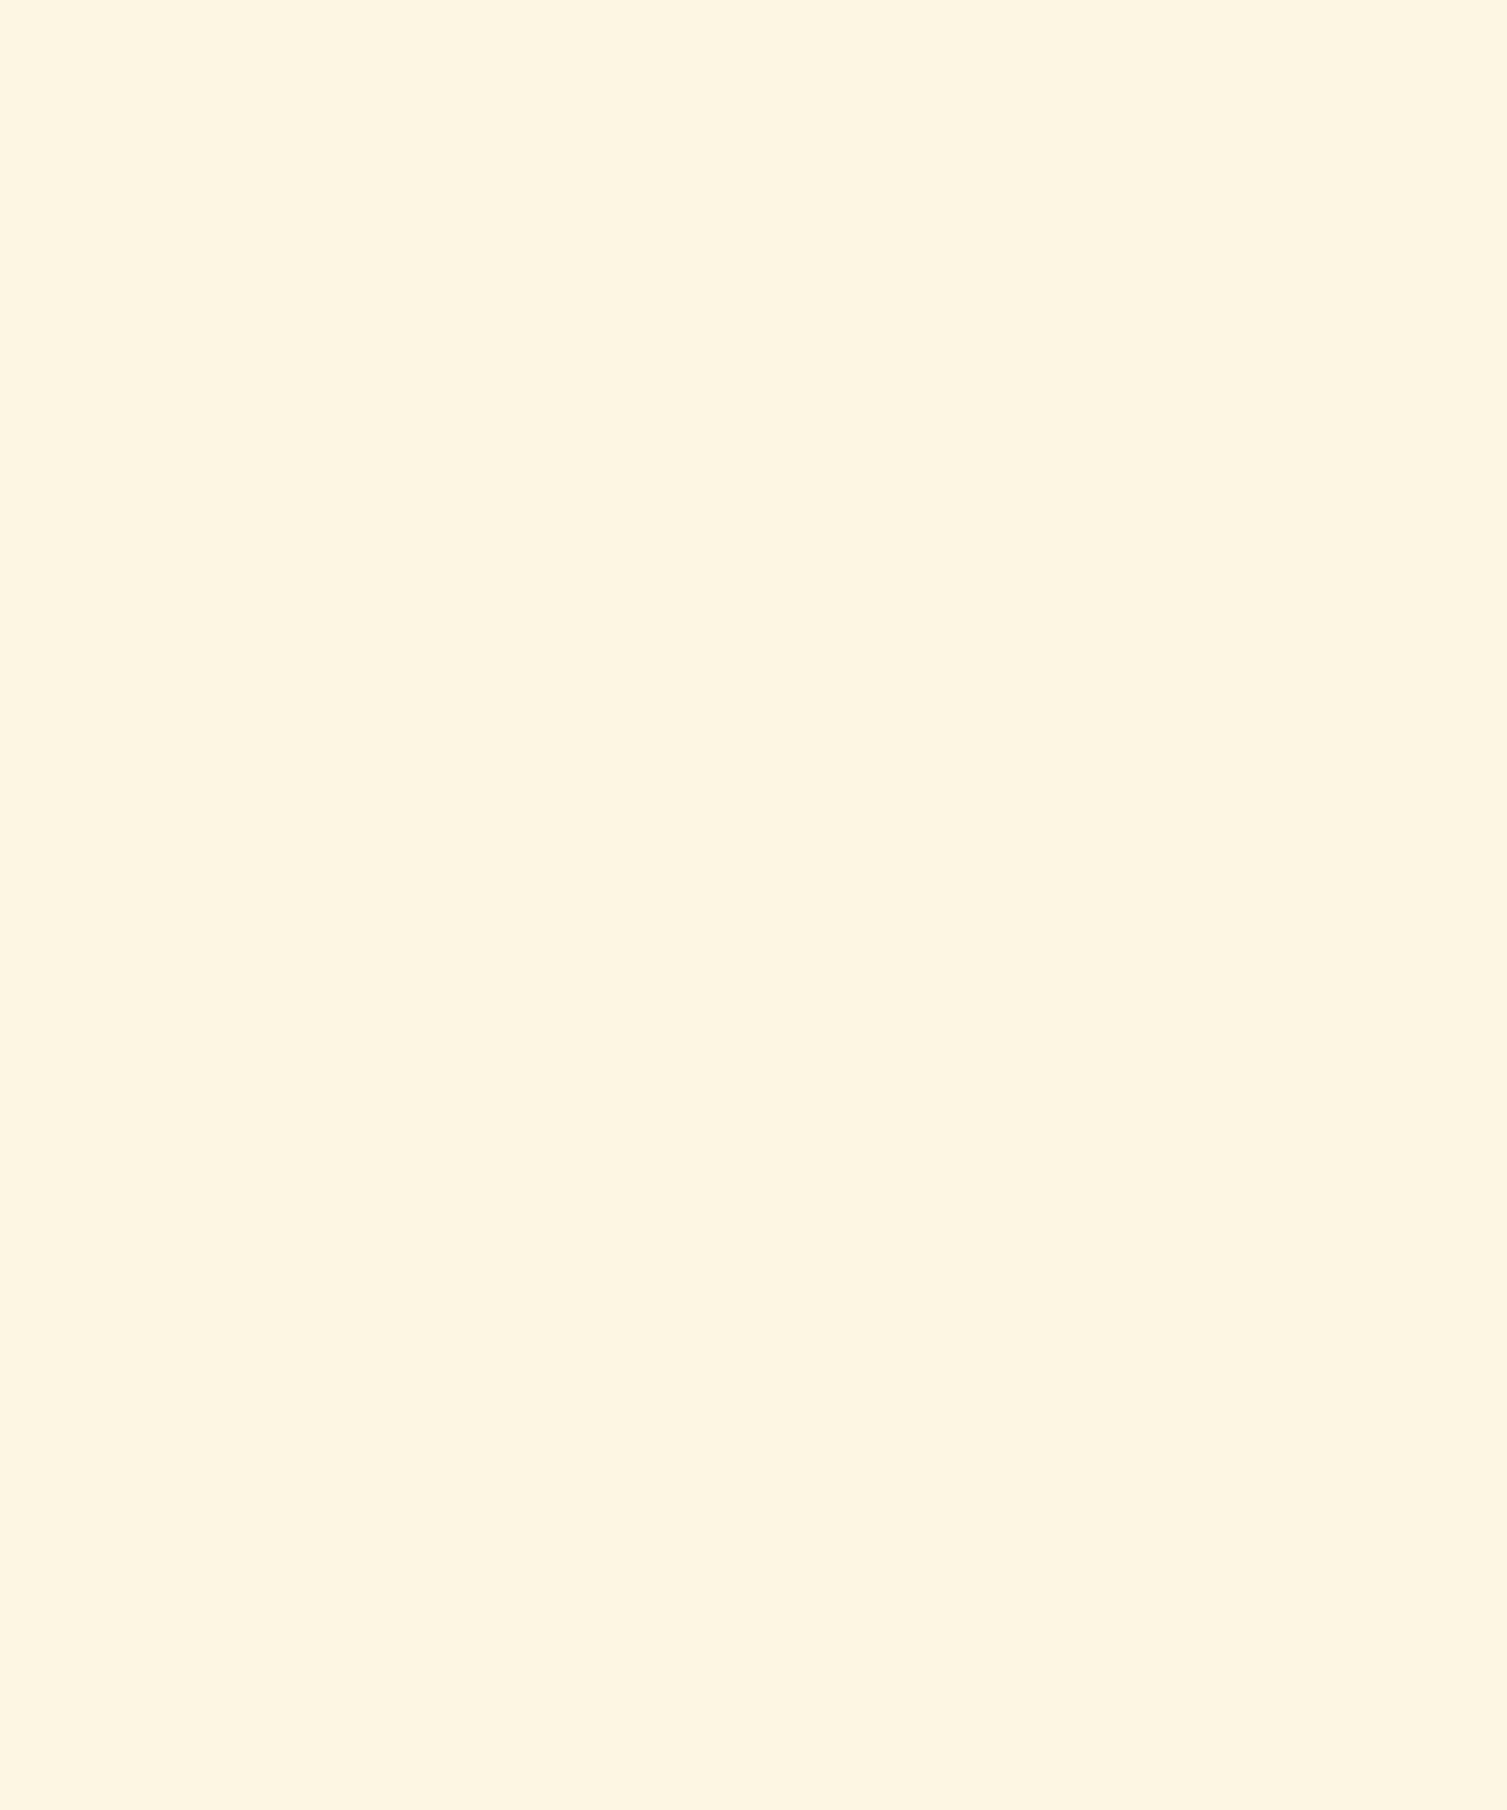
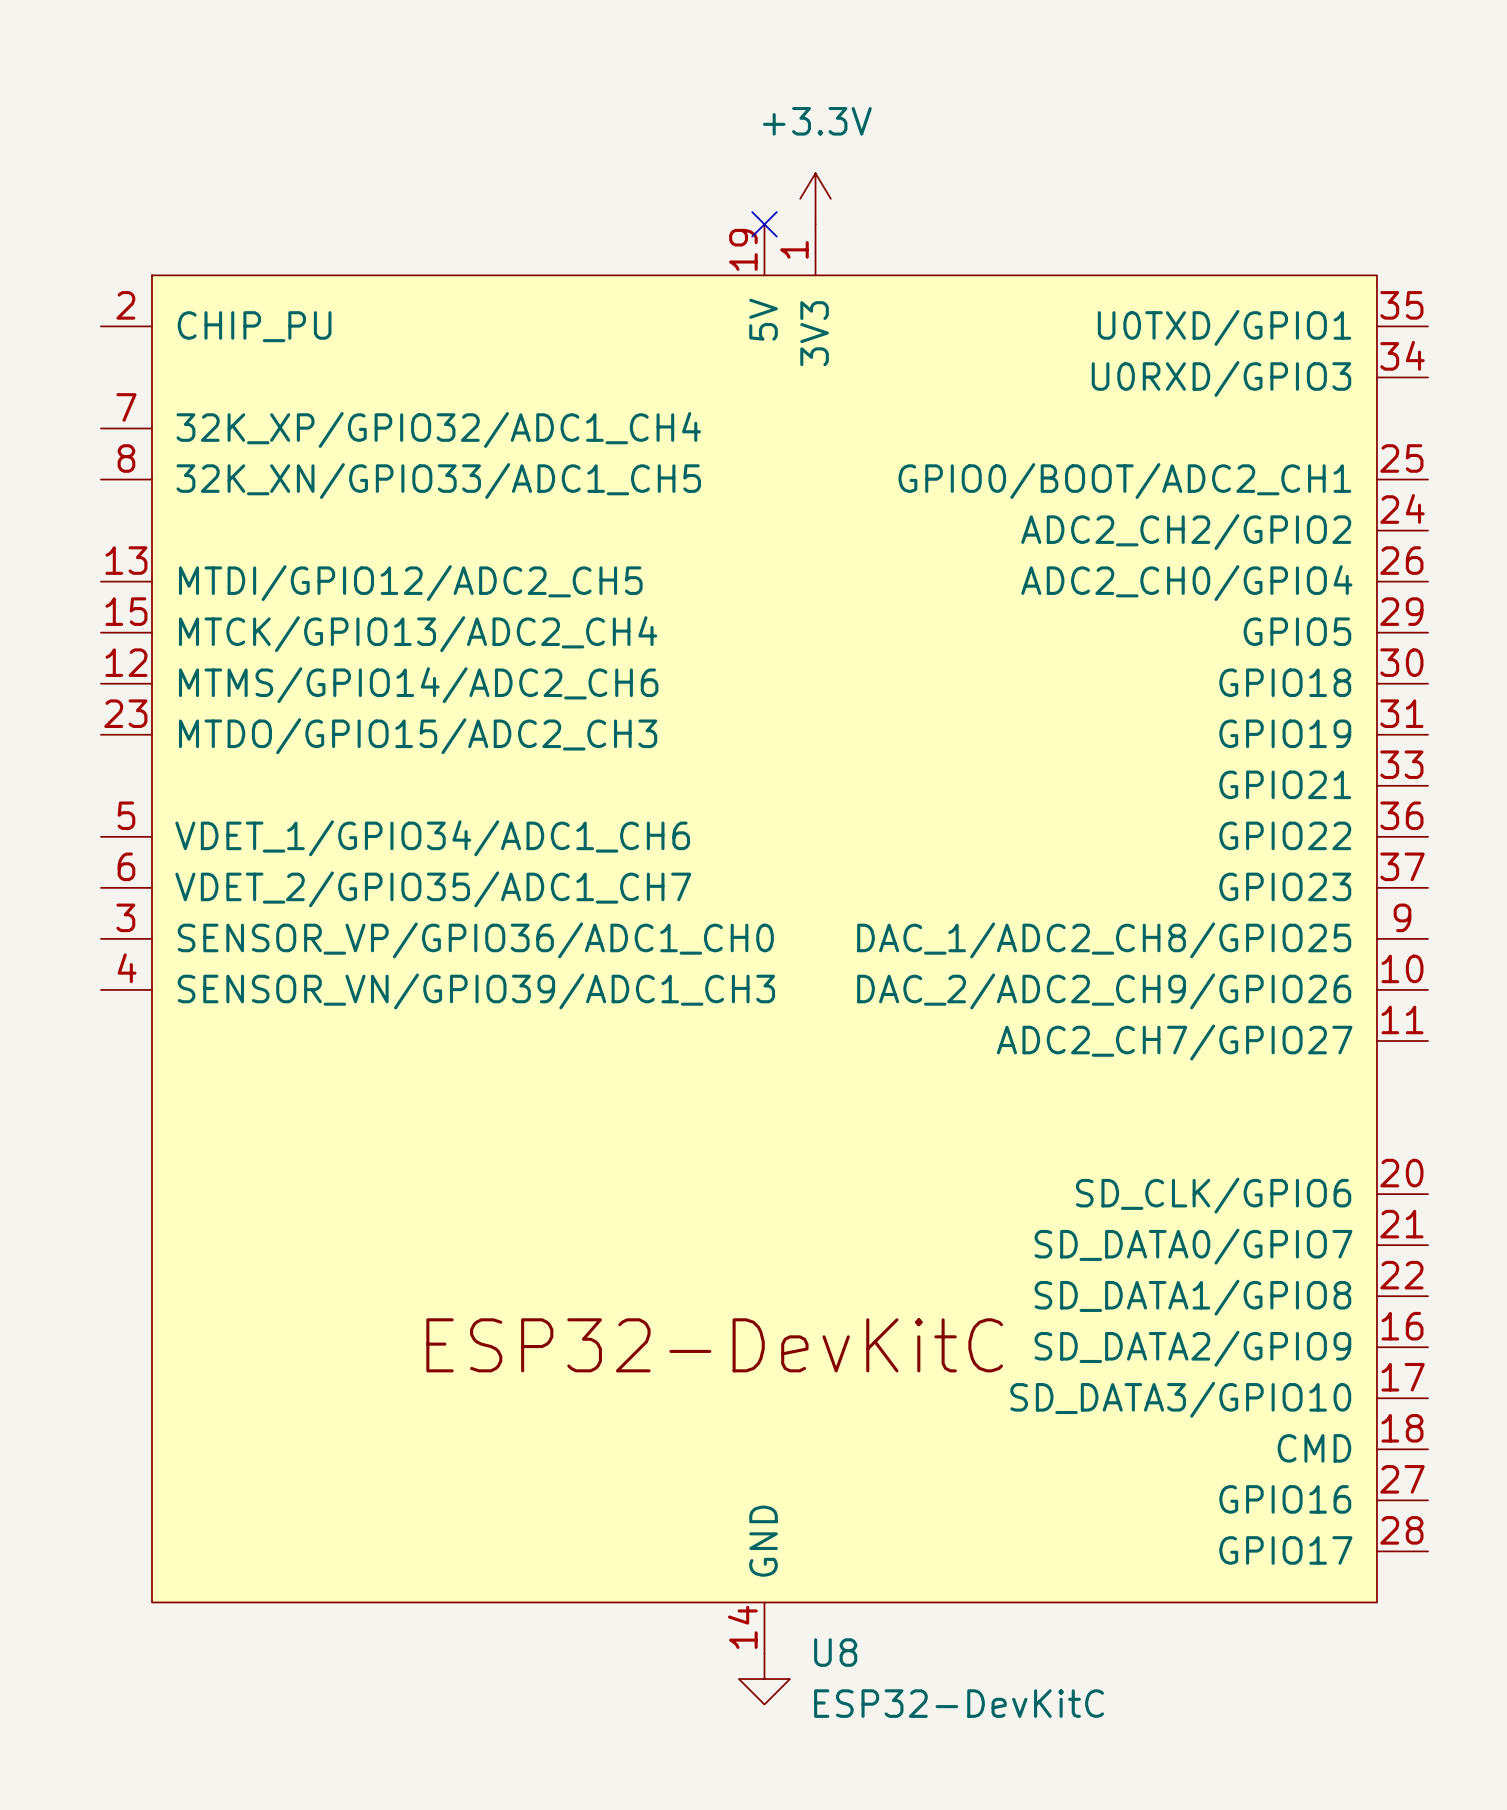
power symbol: none -> +3.3V (815, 198)
no-connect mark: none -> (764, 224)
U8: none -> ESP32-DevKitC (764, 938)
power symbol: none -> (764, 1679)

